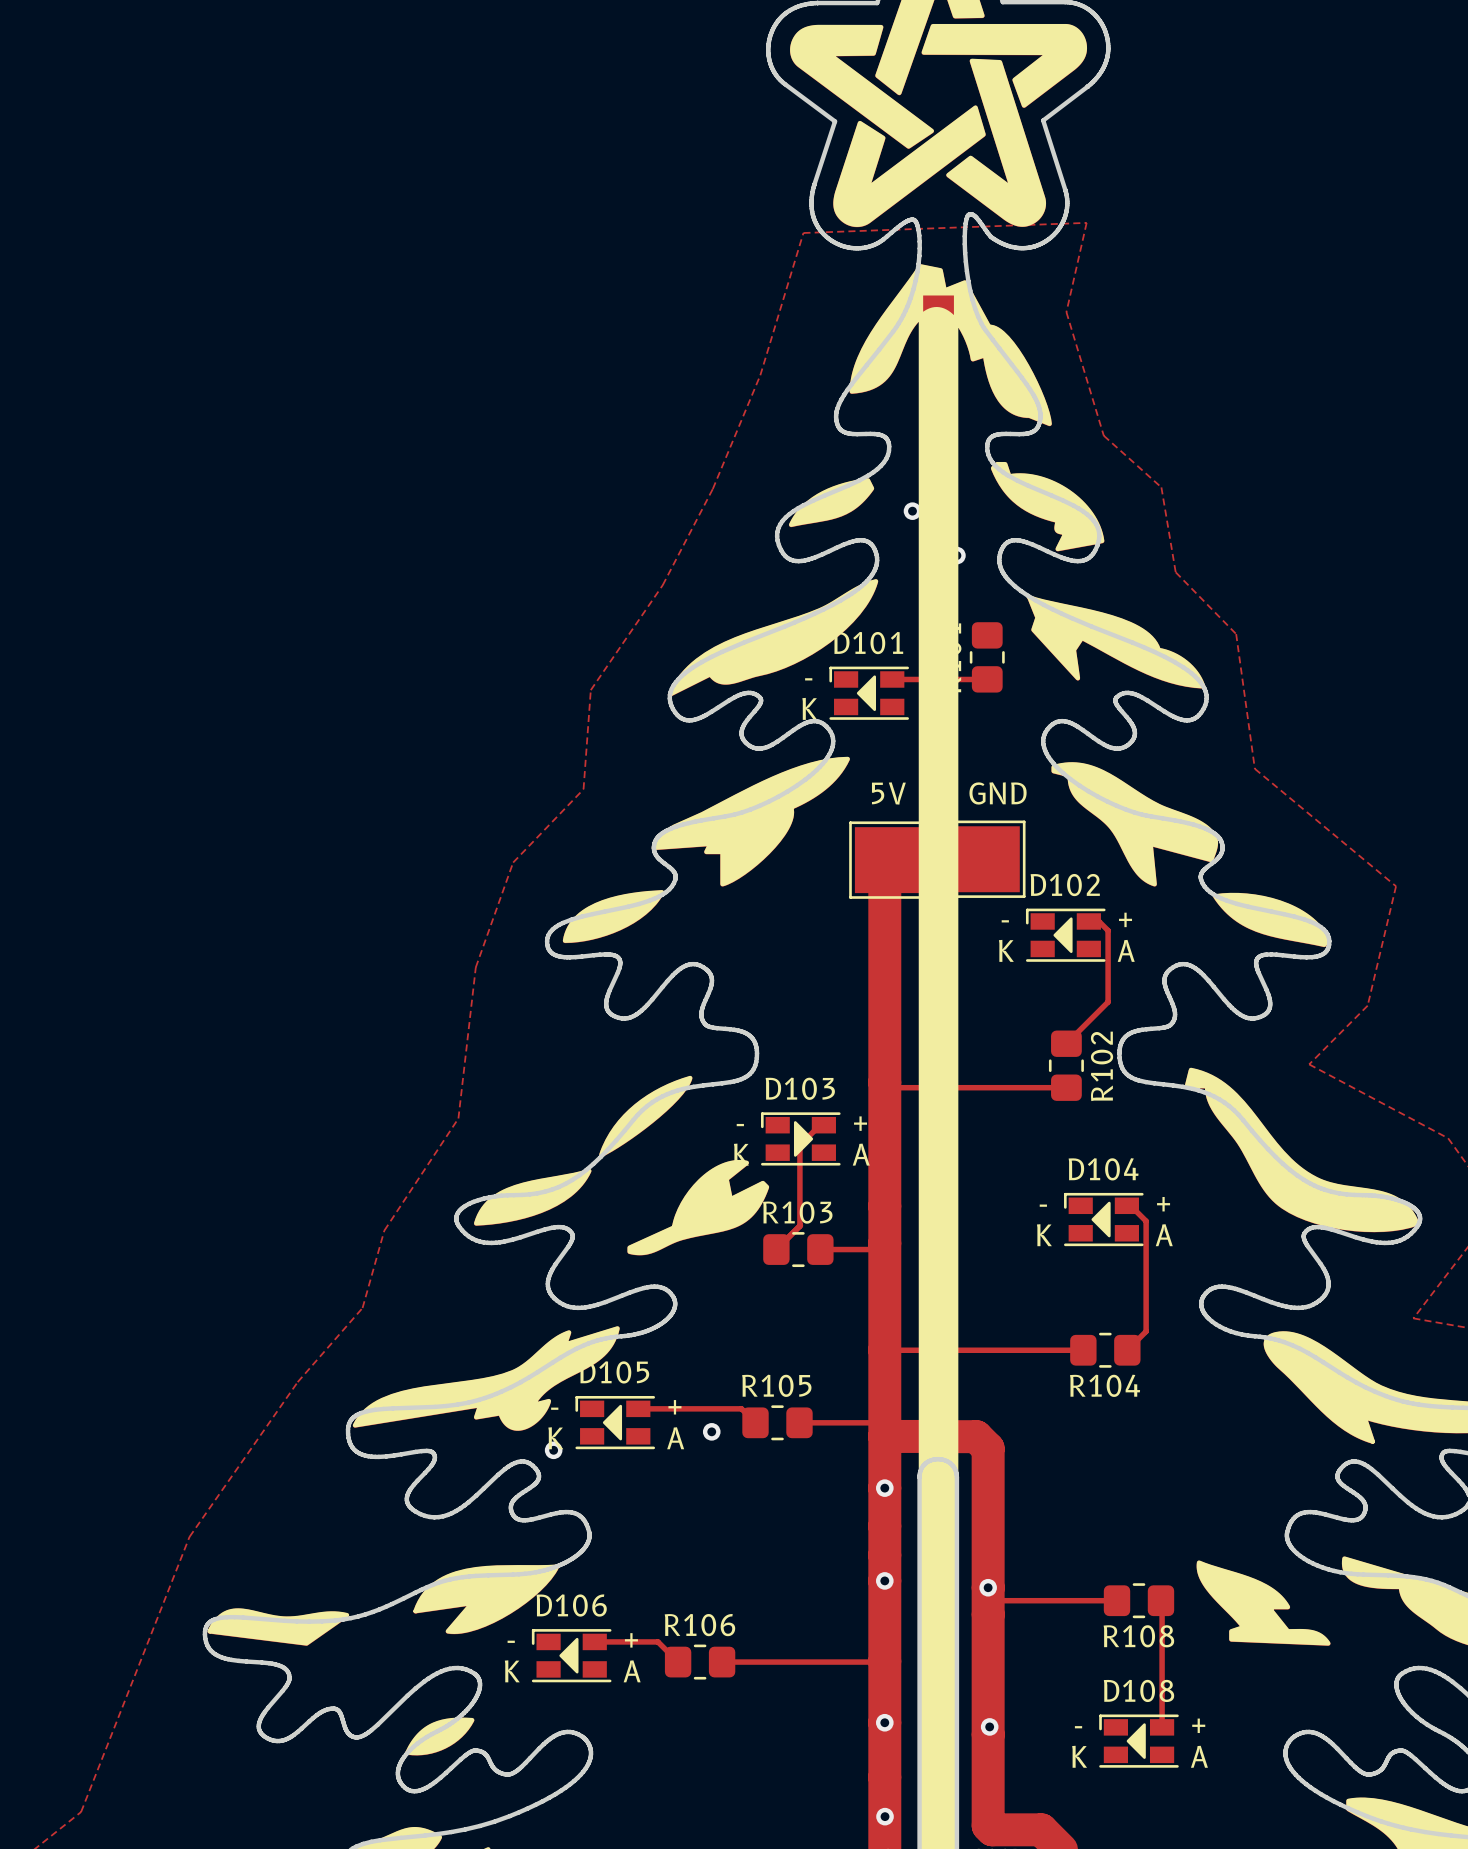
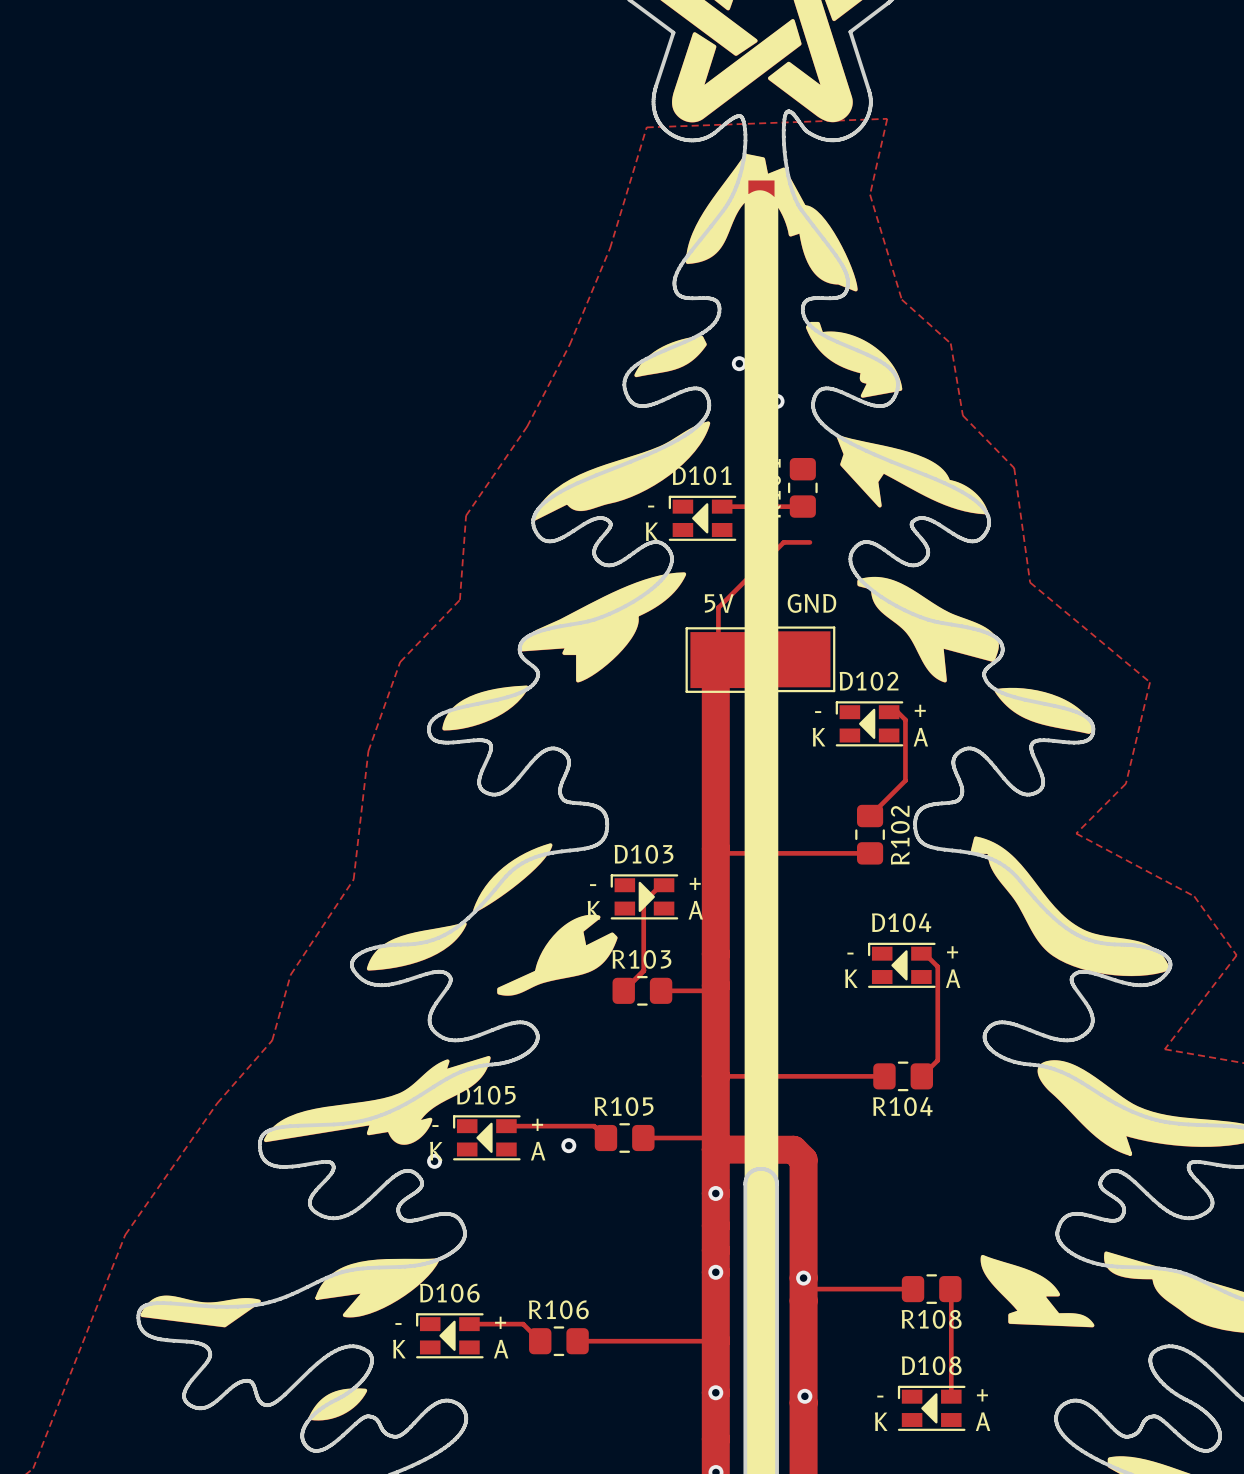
track: none -> (809, 542) (783, 542) (718, 607) (718, 660)

